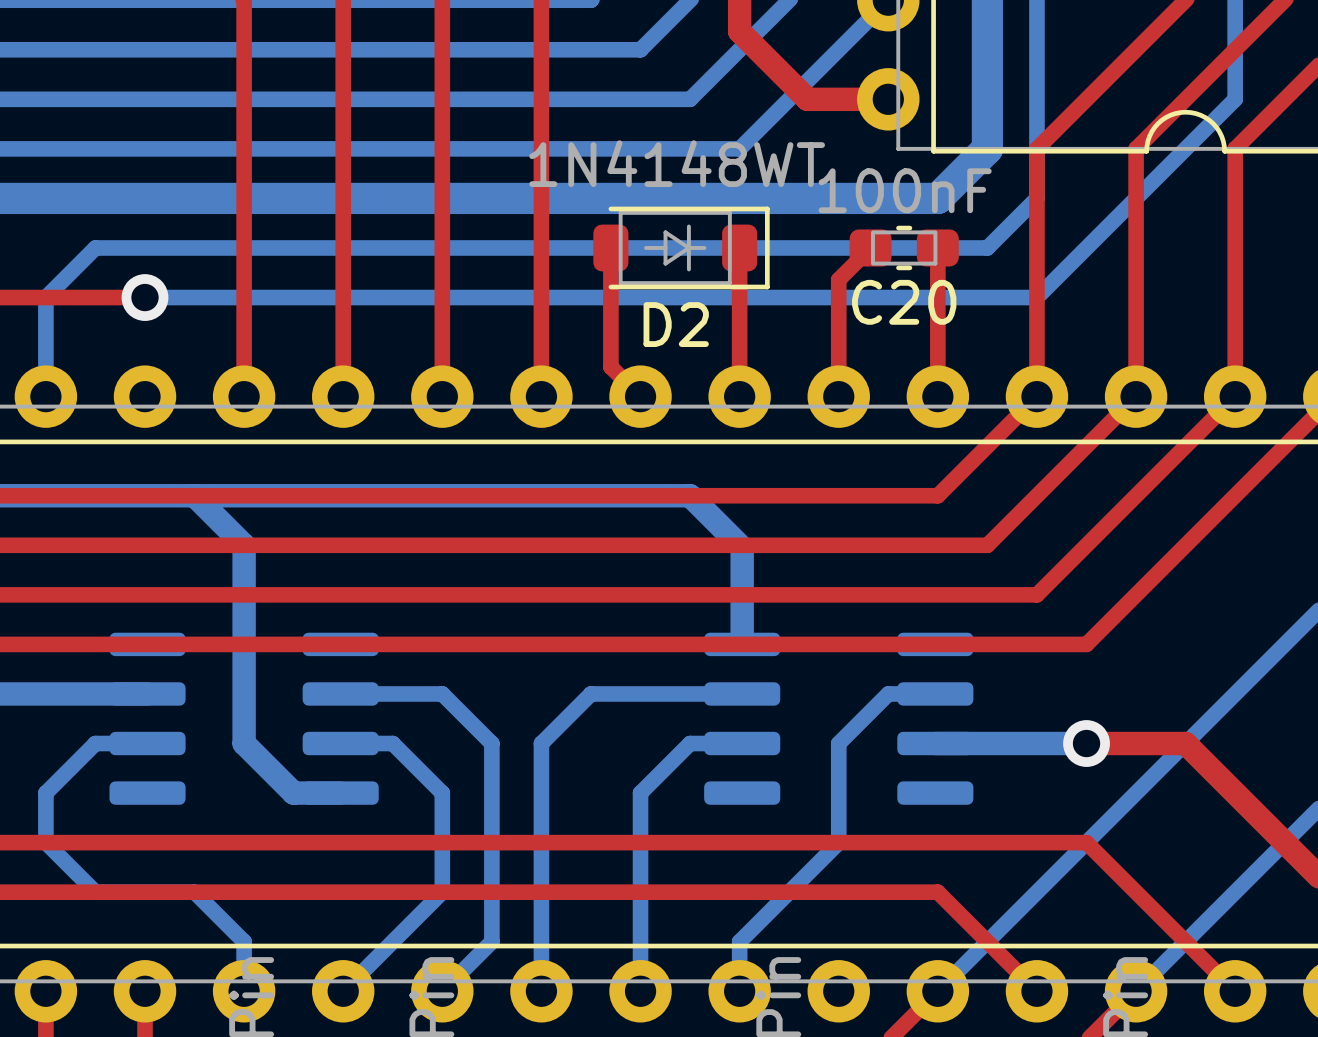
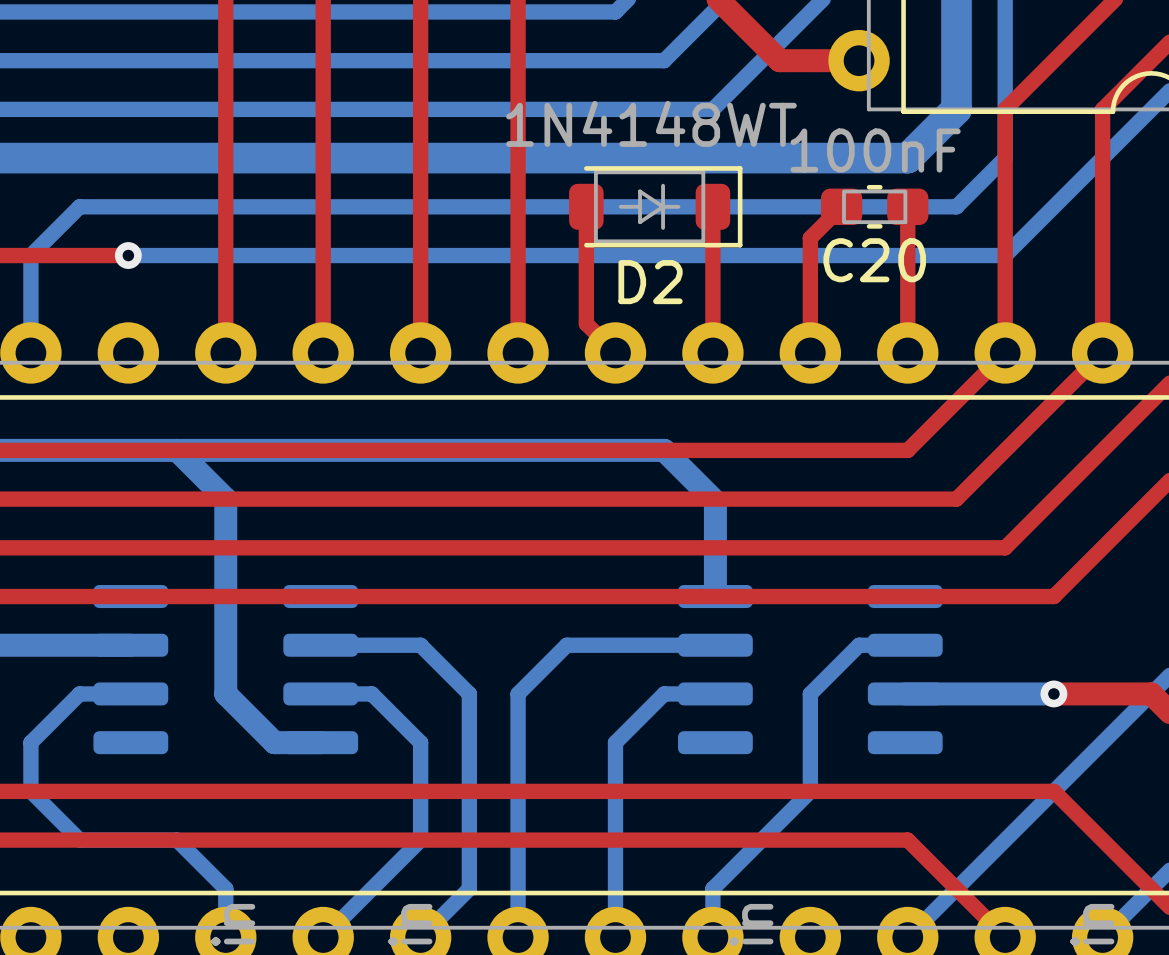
via size: [121, 274, 169, 321] -> [114, 242, 142, 269]
via size: [1063, 720, 1110, 767] -> [1040, 680, 1068, 708]

